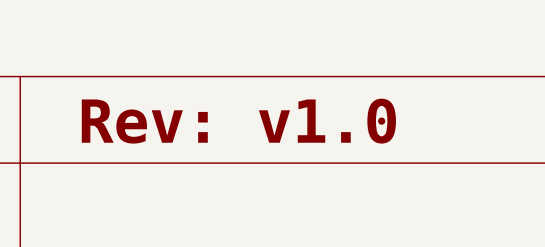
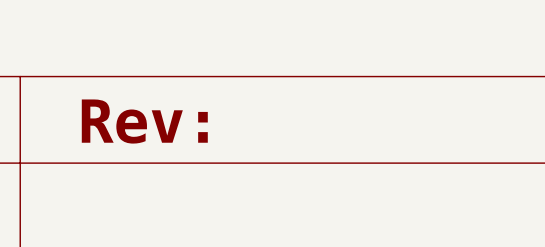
title block: Rev: v1.0 (238, 121) -> Rev: (144, 121)

